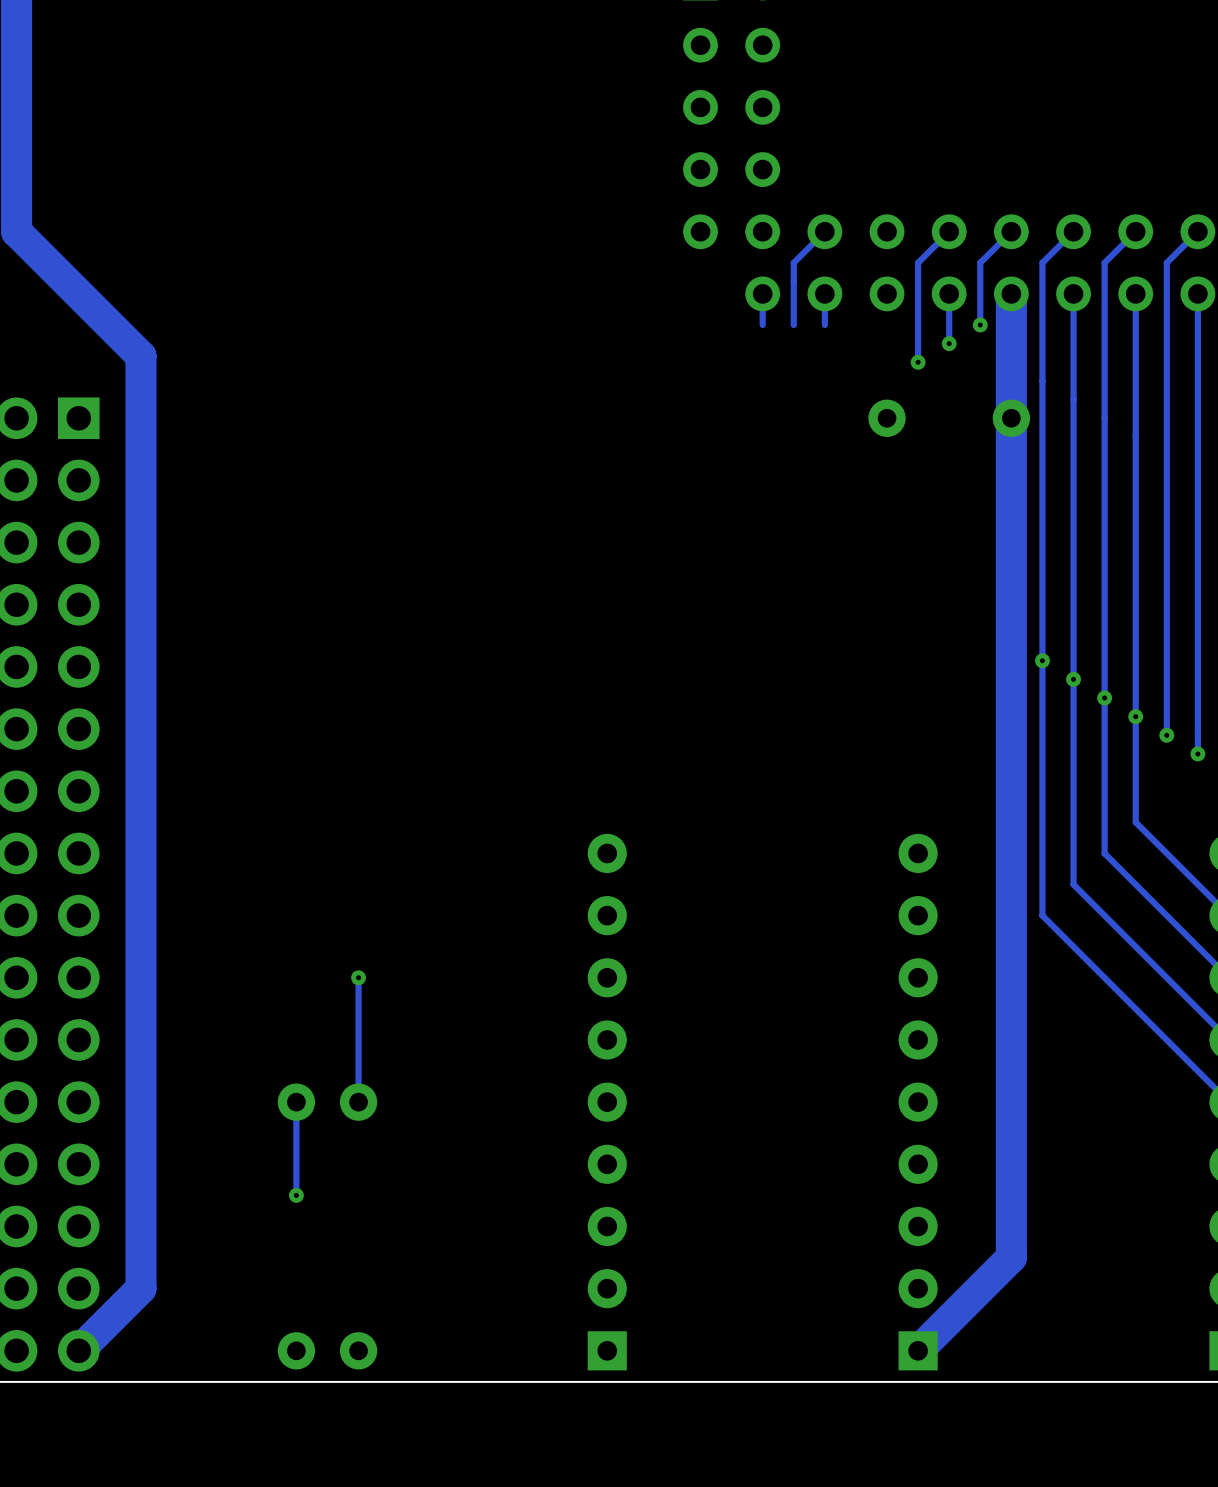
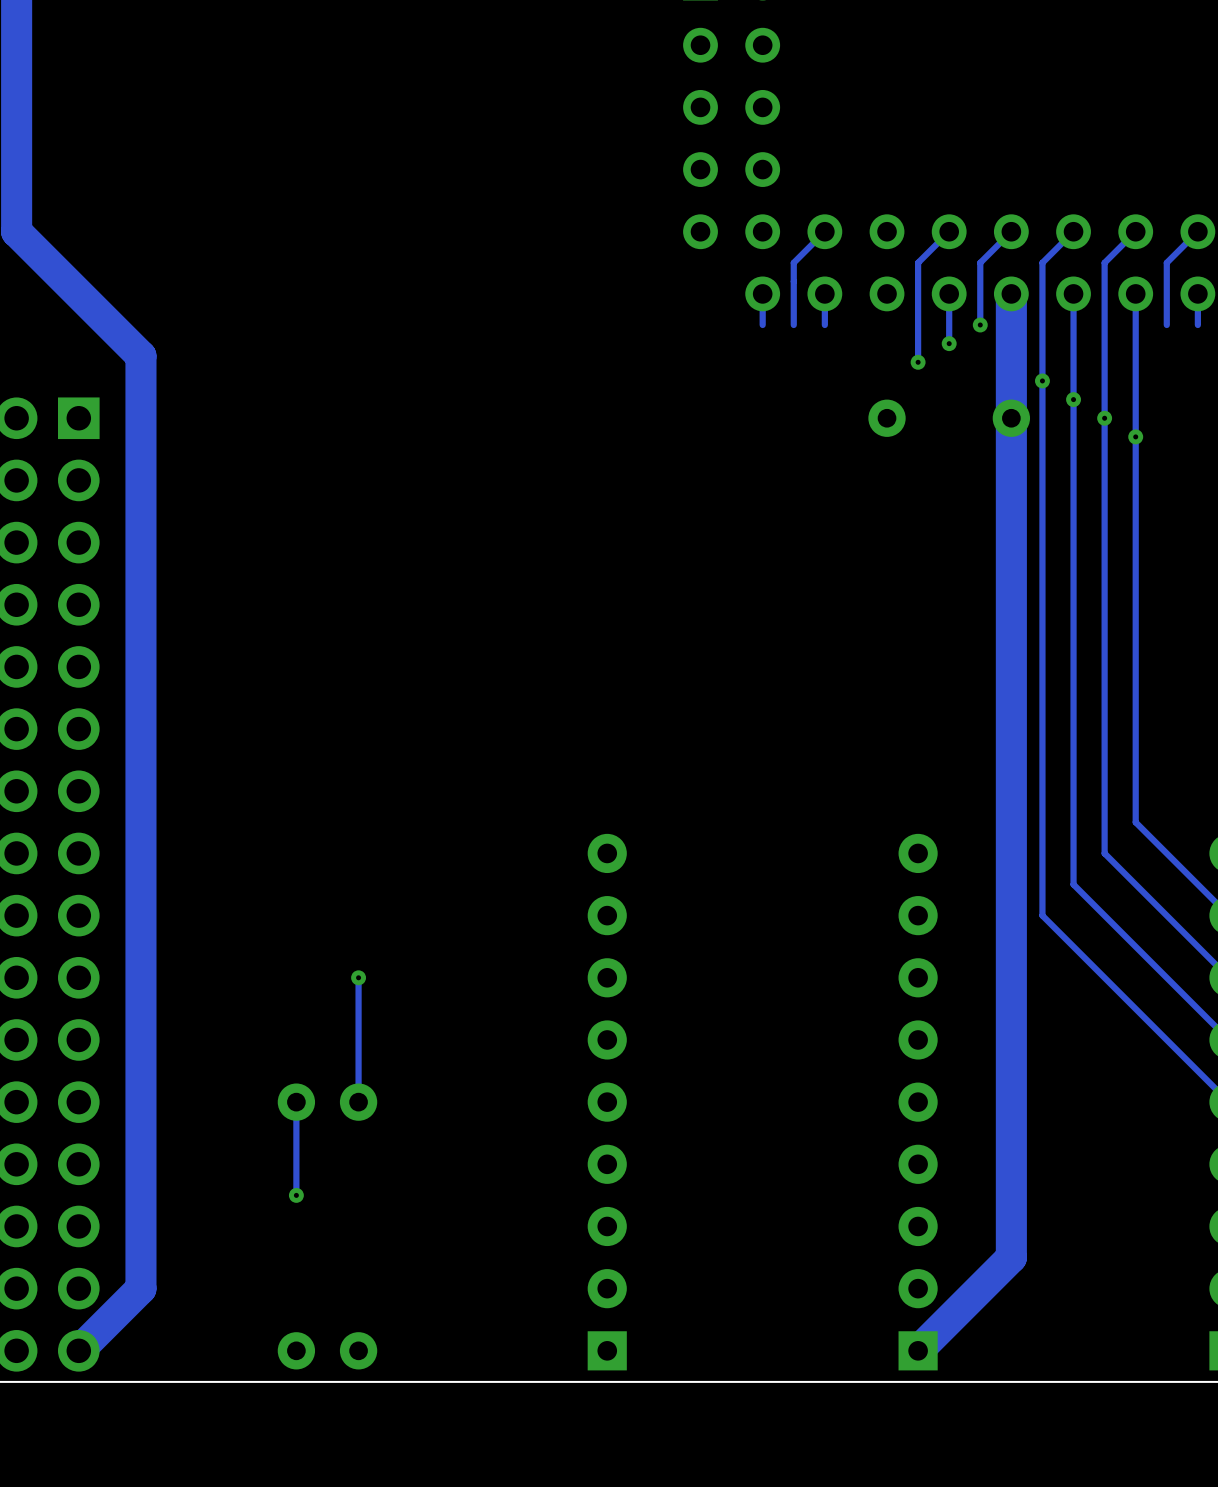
track: (1166, 324) (1166, 735) -> none
track: (1197, 324) (1197, 753) -> none
via: none -> (1042, 380)
via: none -> (1073, 399)
via: none -> (1104, 418)
via: none -> (1135, 436)
via: (1042, 660) -> none
via: (1073, 679) -> none
via: (1104, 698) -> none
via: (1135, 716) -> none
via: (1166, 735) -> none
via: (1197, 753) -> none

